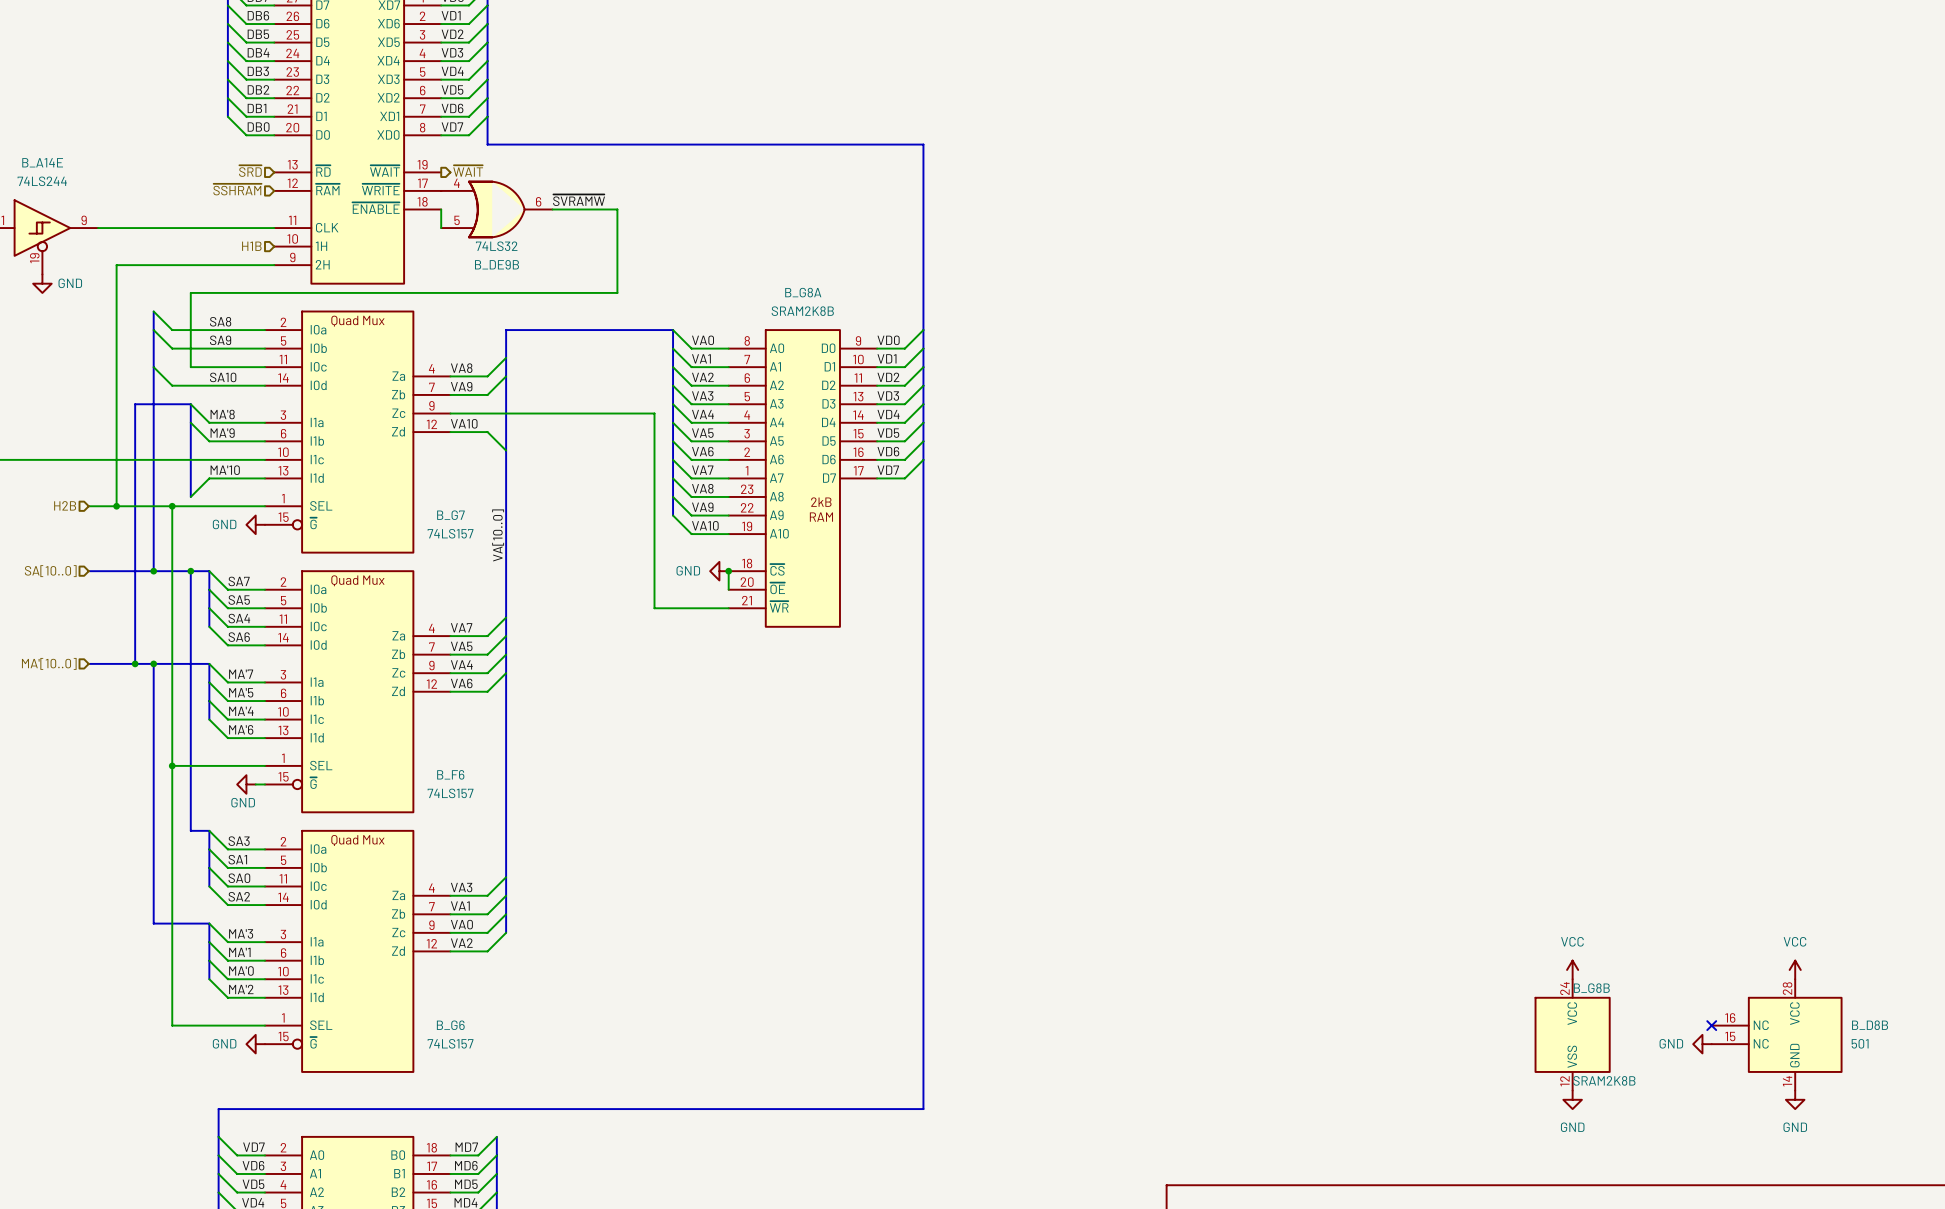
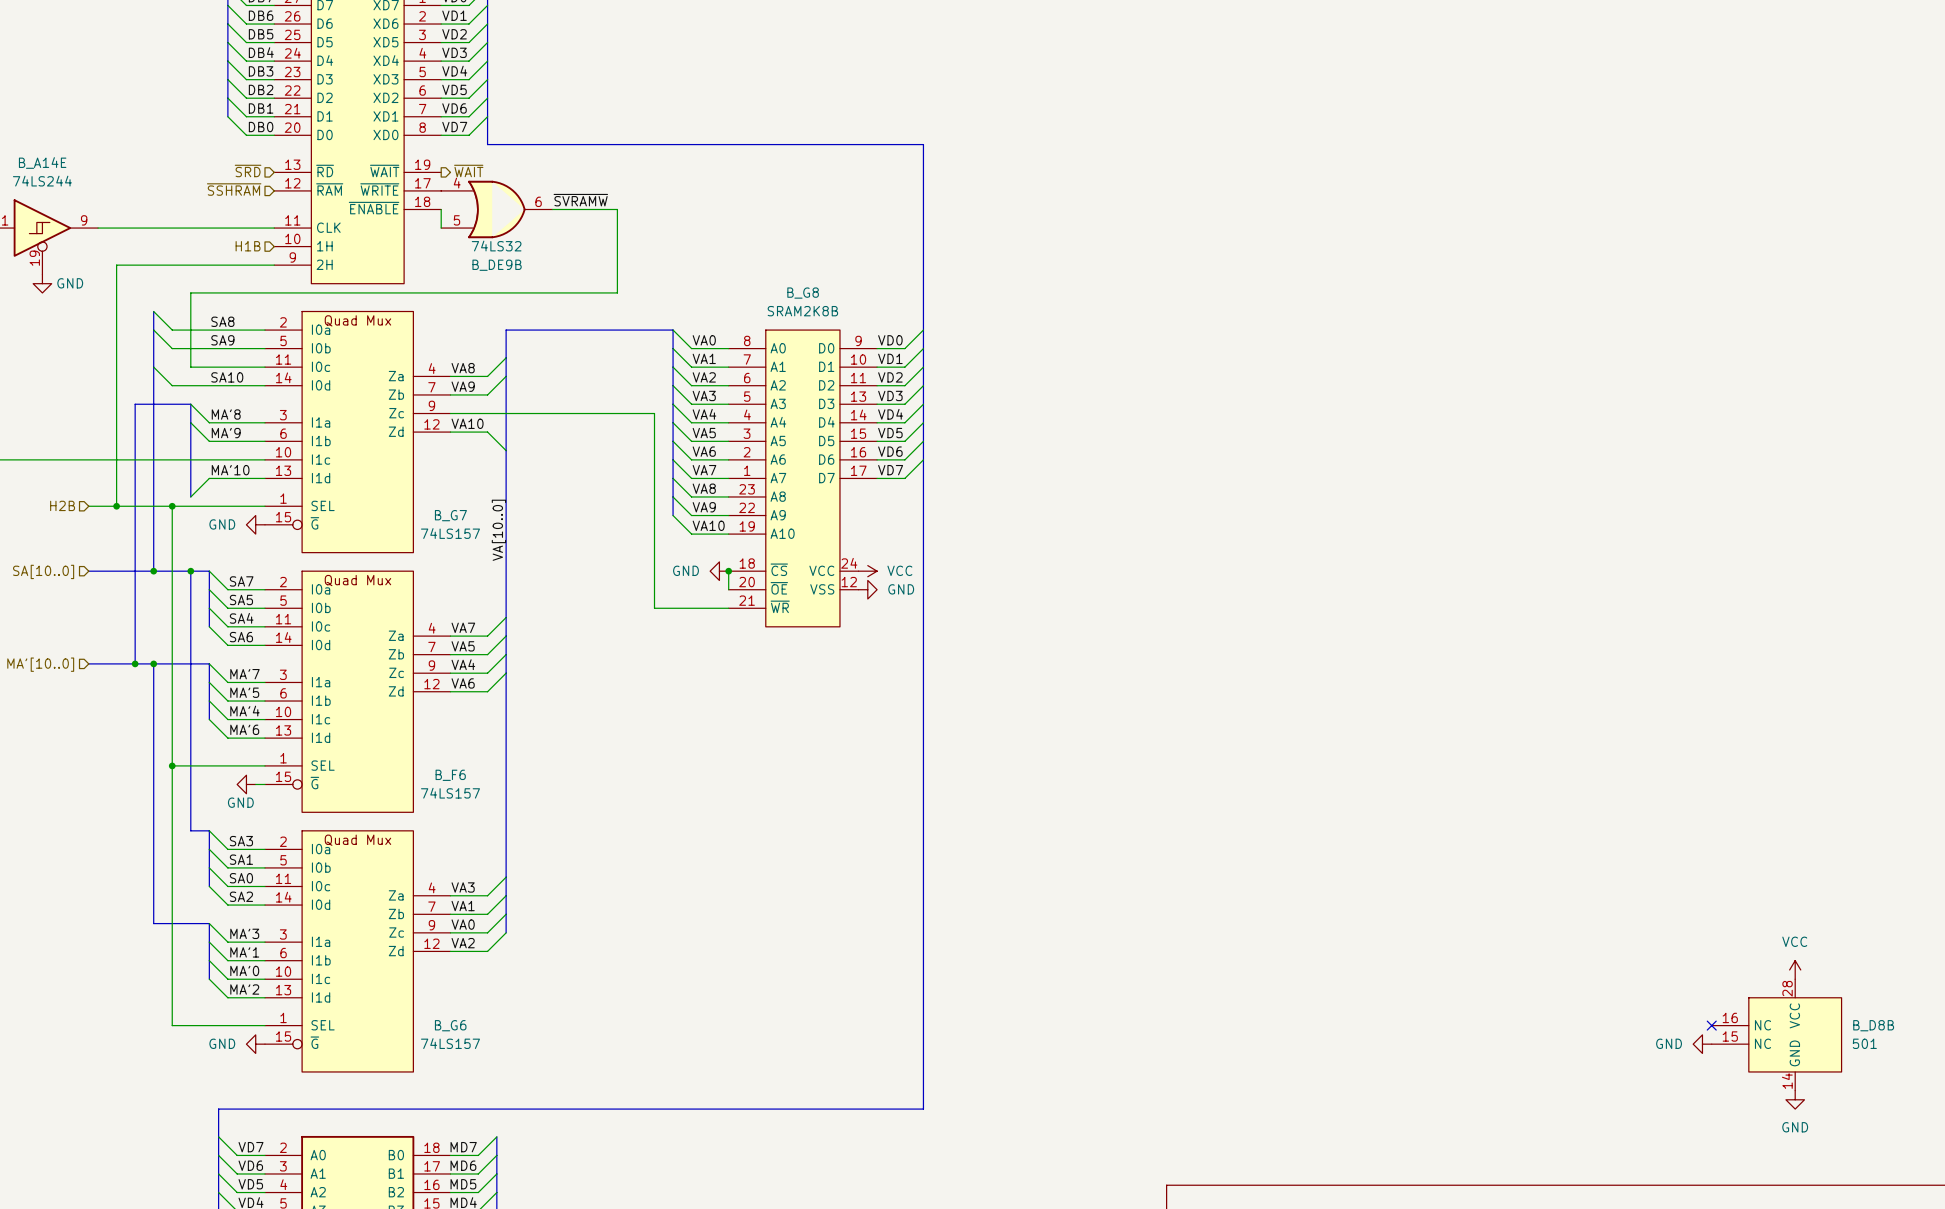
B_G8A: SRAM2K8B (802, 478) -> none
B_G8: none -> SRAM2K8B (802, 478)
power symbol: none -> VCC (867, 571)
power symbol: none -> GND (867, 589)
power symbol: VCC (1572, 969) -> none
B_G8B: SRAM2K8B (1572, 1034) -> none
power symbol: GND (1572, 1099) -> none

